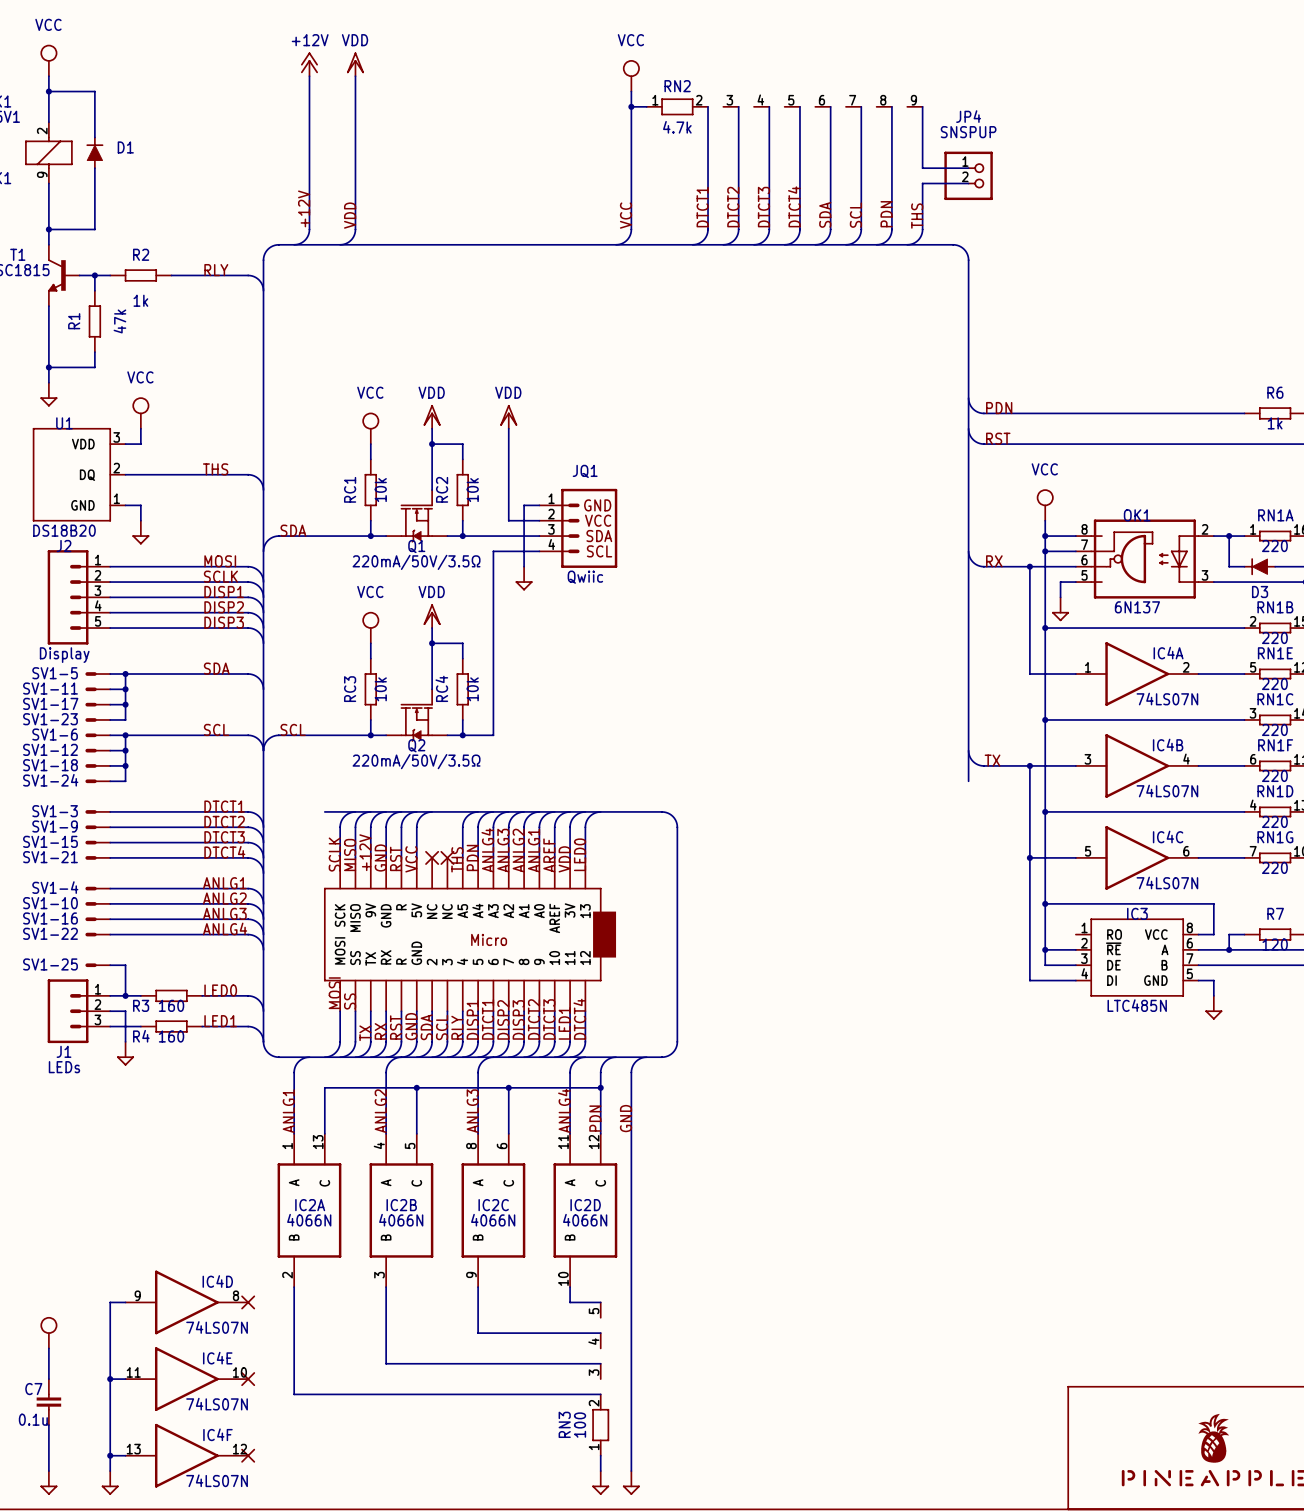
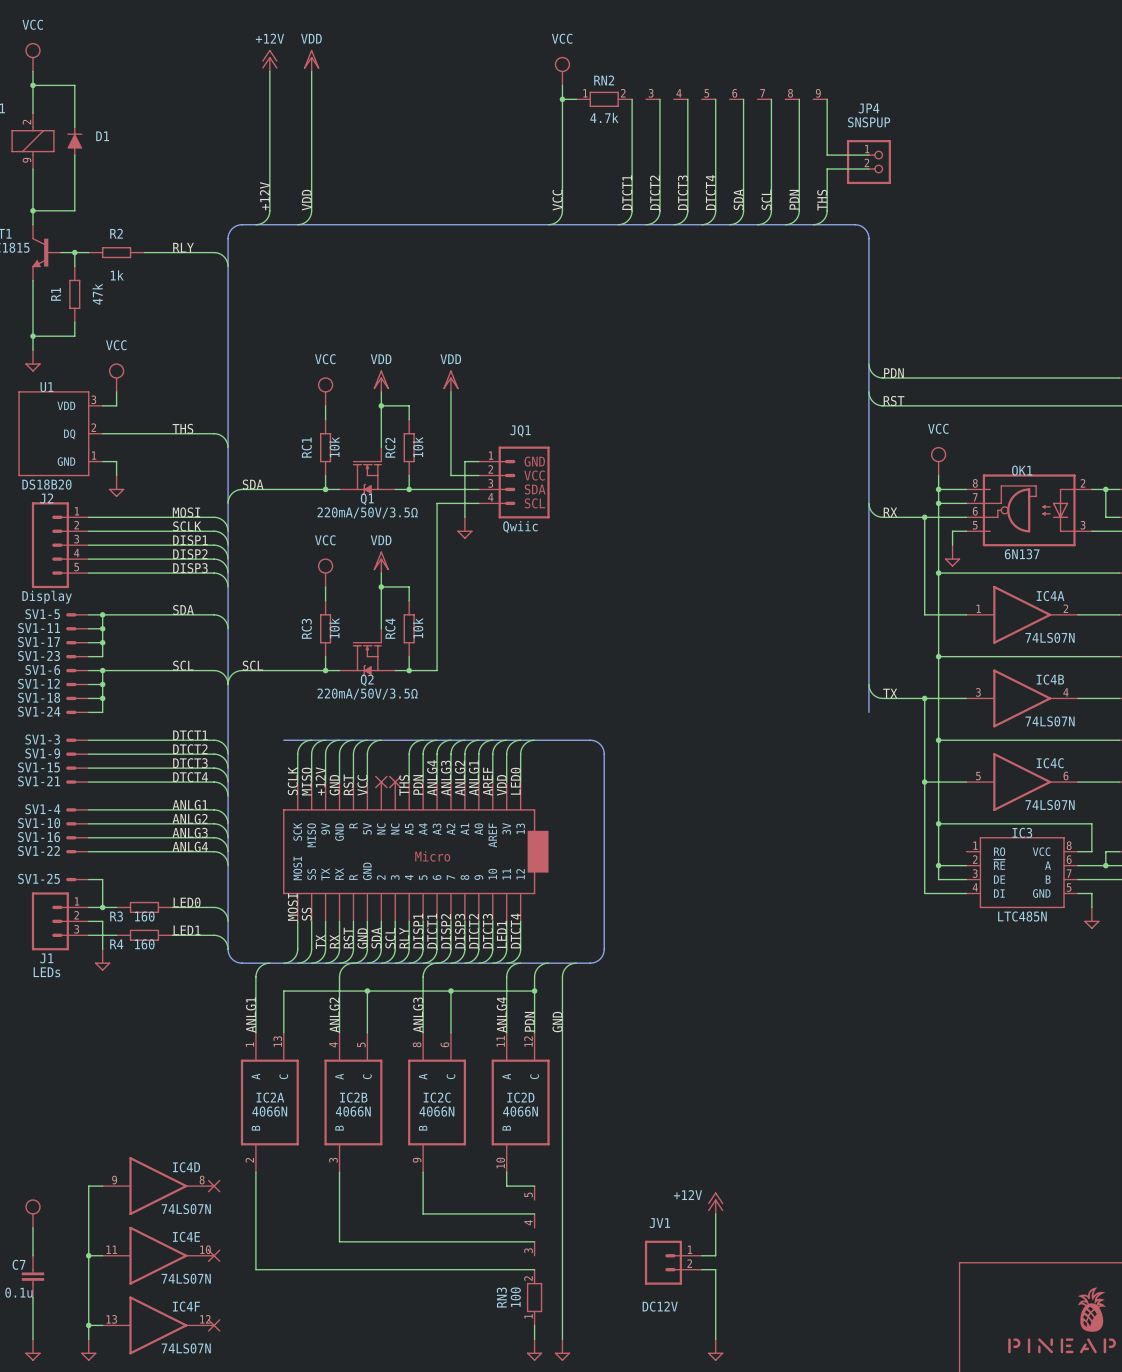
power symbol: none -> +12V (715, 1203)
wire: none -> (715, 1213) (715, 1255) (701, 1255)
JV1: none -> DC12V (673, 1262)
wire: none -> (701, 1269) (715, 1269) (715, 1339)
power symbol: none -> (715, 1350)

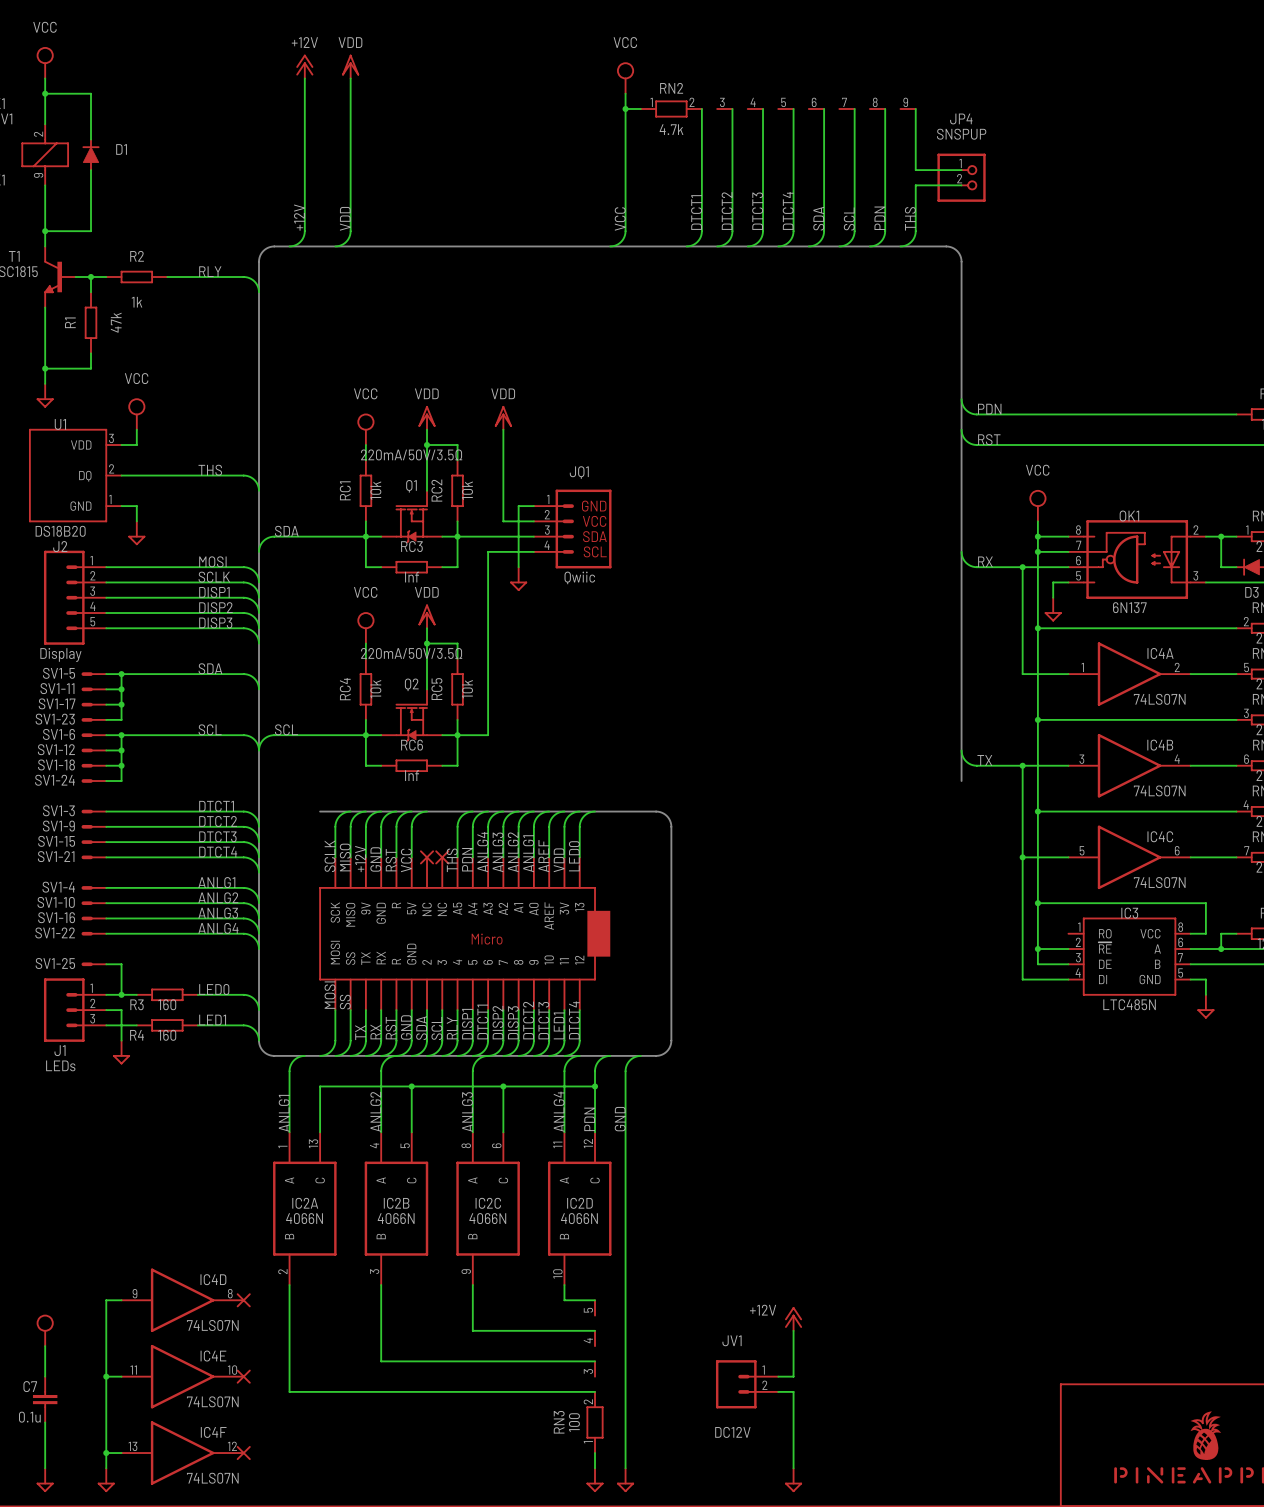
wire: none -> (365, 536) (365, 567) (381, 567)
wire: none -> (457, 536) (457, 567) (442, 567)
Q1 name position: Q1 (367, 499) -> Q1 (411, 486)
Q1 value position: 220mA/50V/3.5Ω (367, 512) -> 220mA/50V/3.5Ω (411, 454)
RC3: none -> Inf (411, 567)
RC3 name: RC3 (306, 628) -> RC4 (345, 689)
RC4 name: RC4 (390, 628) -> RC5 (436, 689)
wire: none -> (365, 735) (365, 765) (381, 765)
wire: none -> (457, 735) (457, 765) (442, 765)
Q2 name position: Q2 (367, 680) -> Q2 (411, 684)
Q2 value position: 220mA/50V/3.5Ω (367, 694) -> 220mA/50V/3.5Ω (411, 653)
RC6: none -> Inf (411, 765)

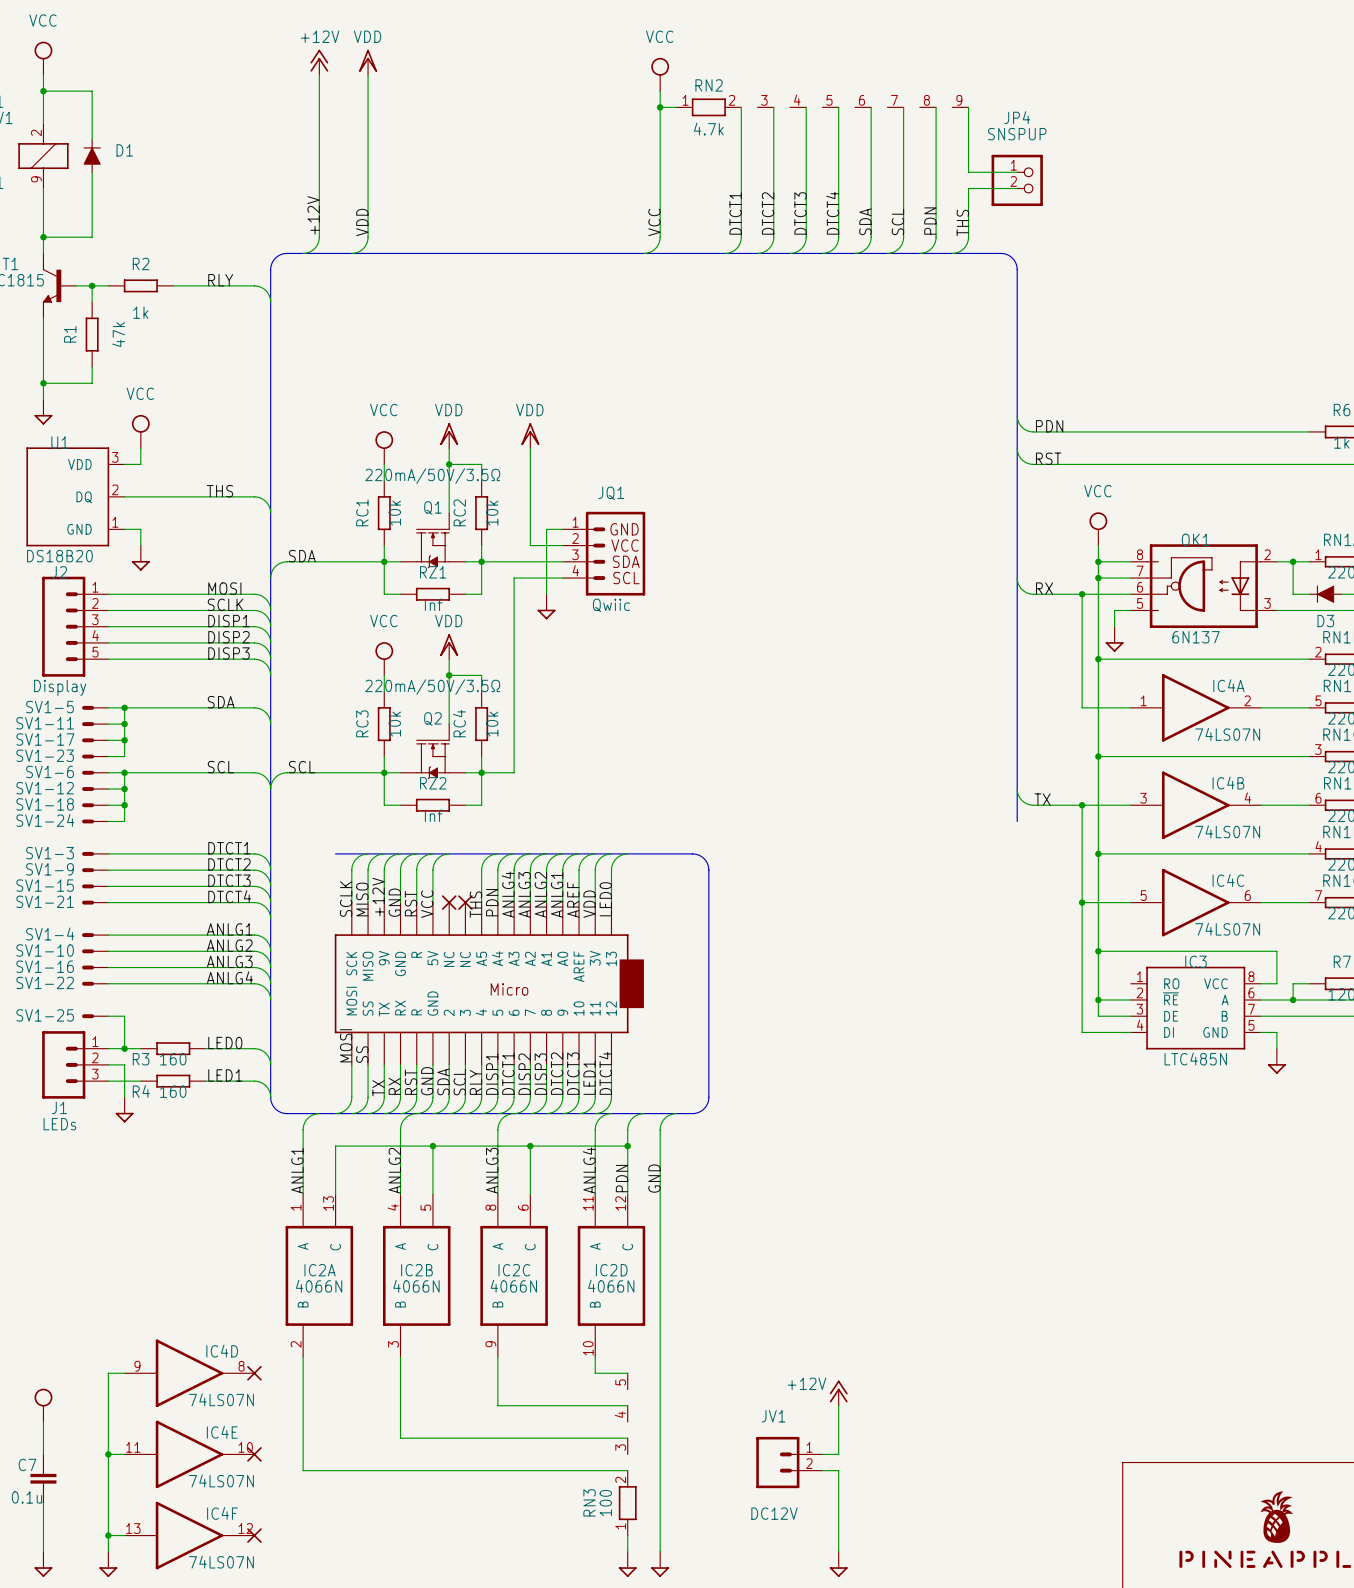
RC3 name: RC3 (411, 546) -> RZ1 (433, 572)
RC4 name: RC4 (345, 689) -> RC3 (362, 723)
RC5 name: RC5 (436, 689) -> RC4 (459, 723)
RC6 name: RC6 (412, 745) -> RZ2 (433, 783)

